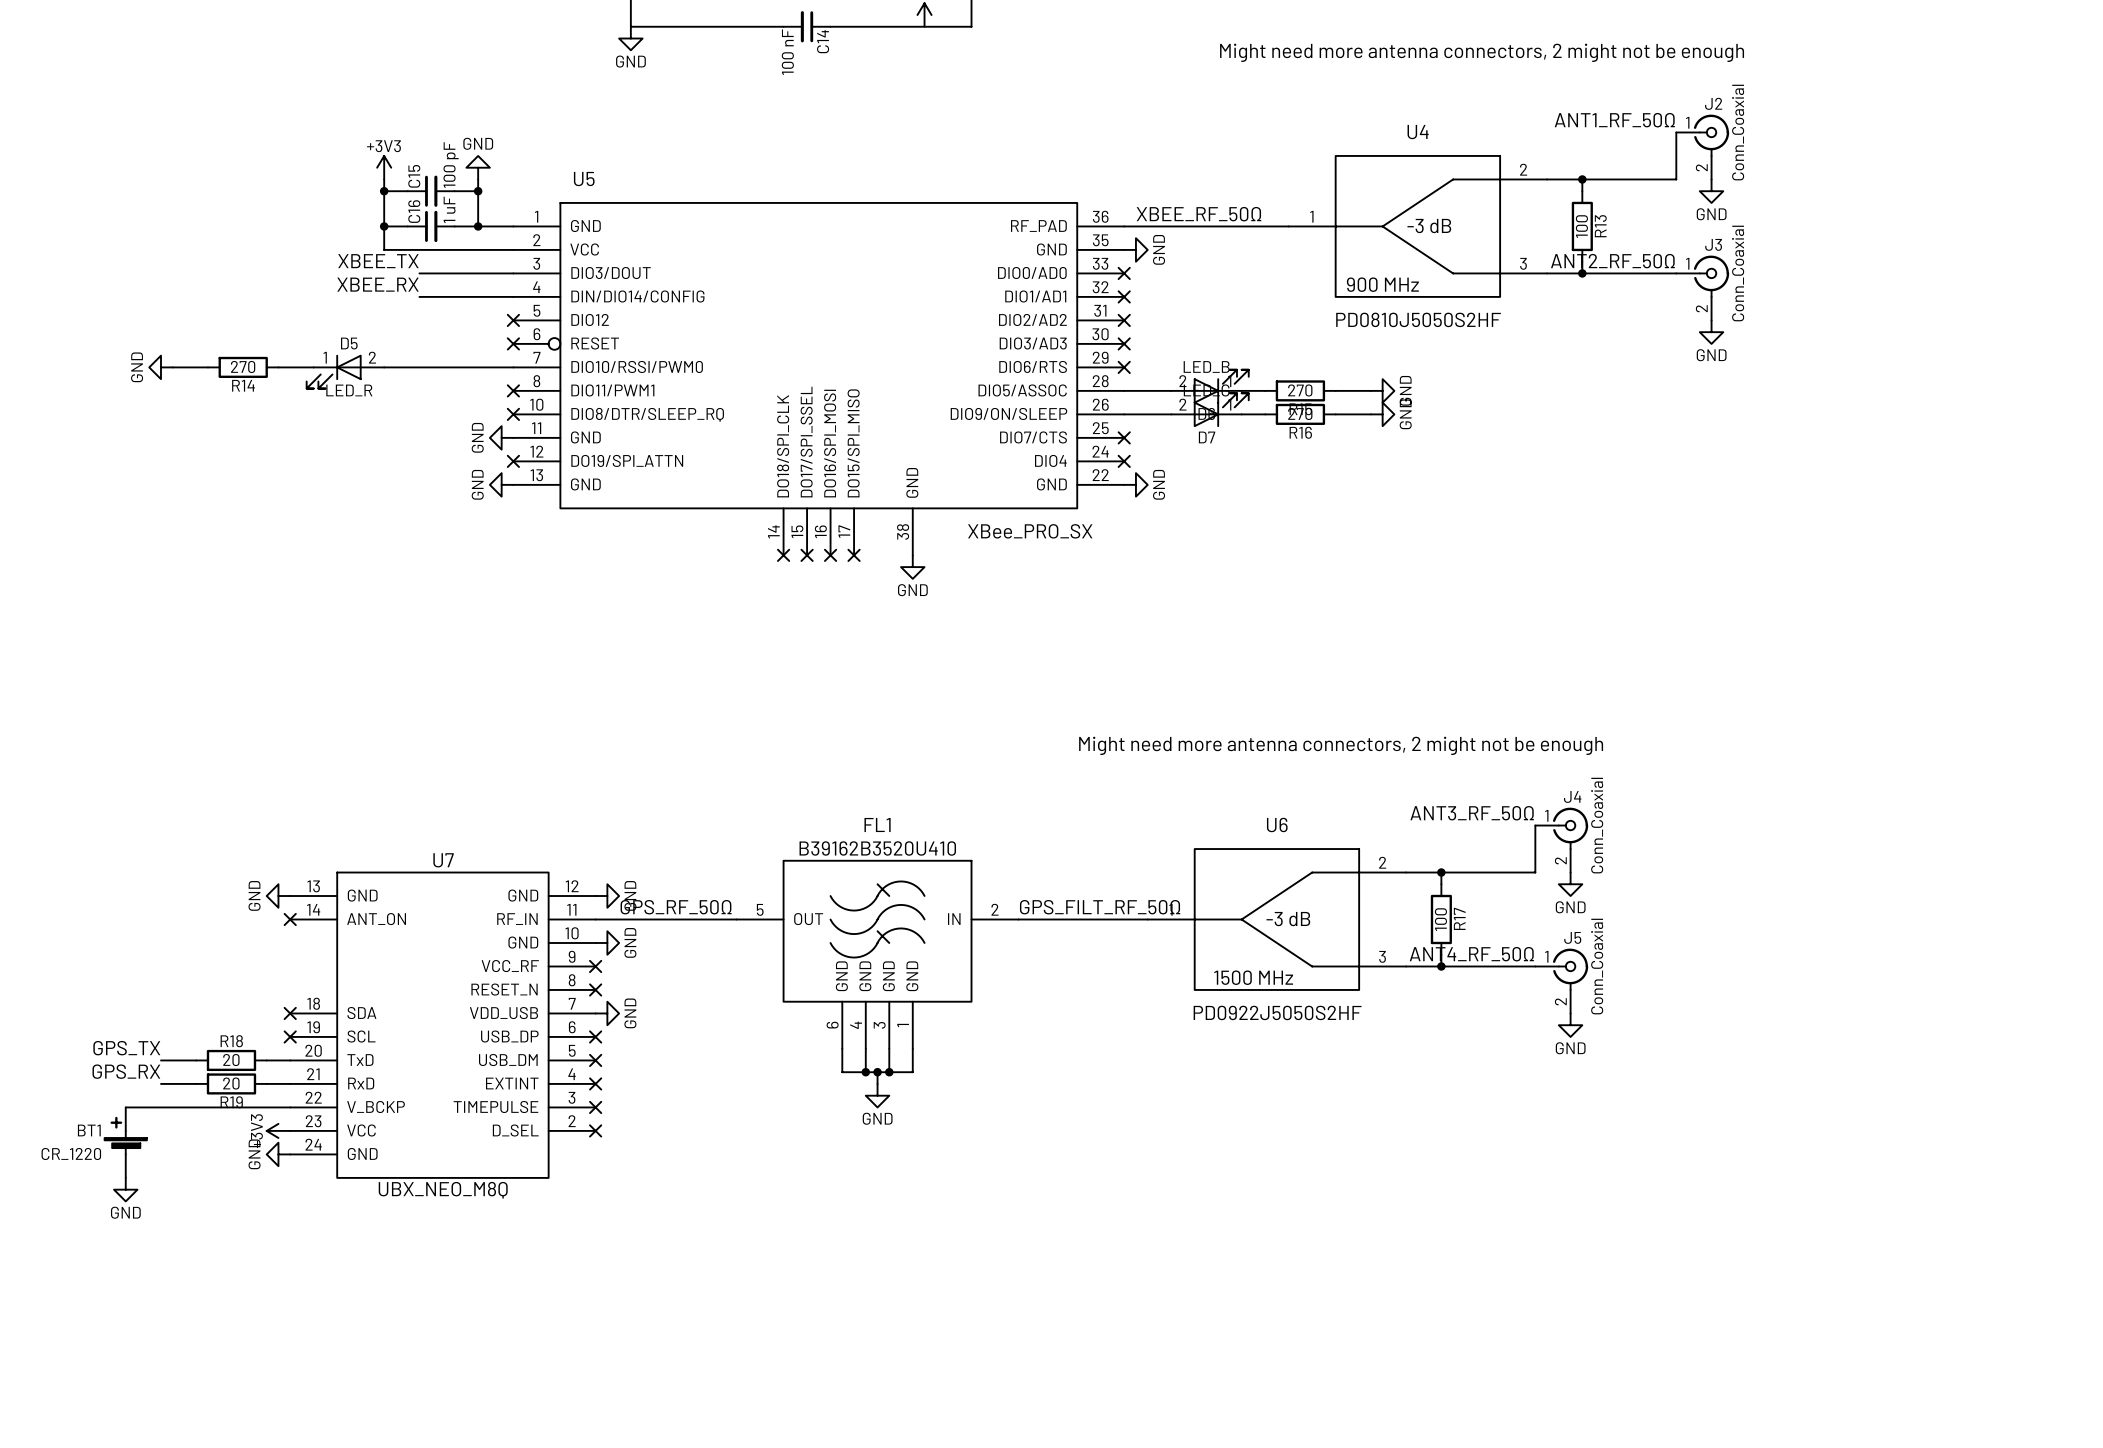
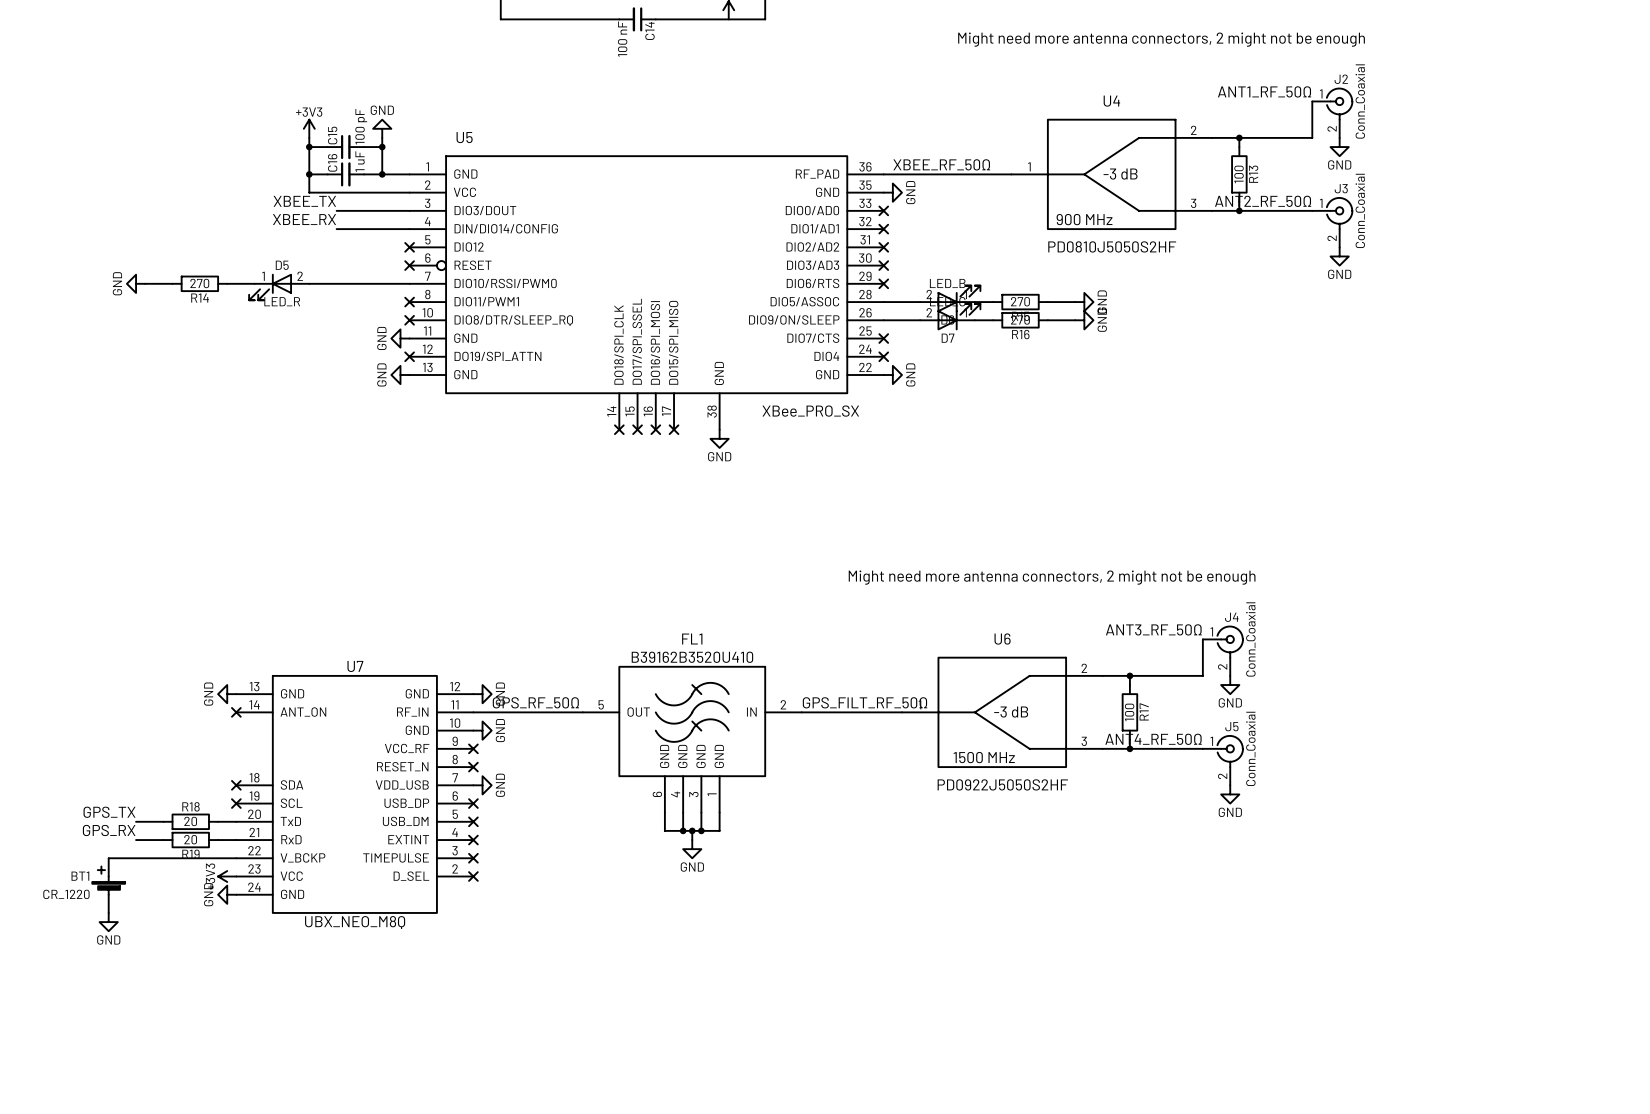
power symbol: GND (630, 38) -> none

